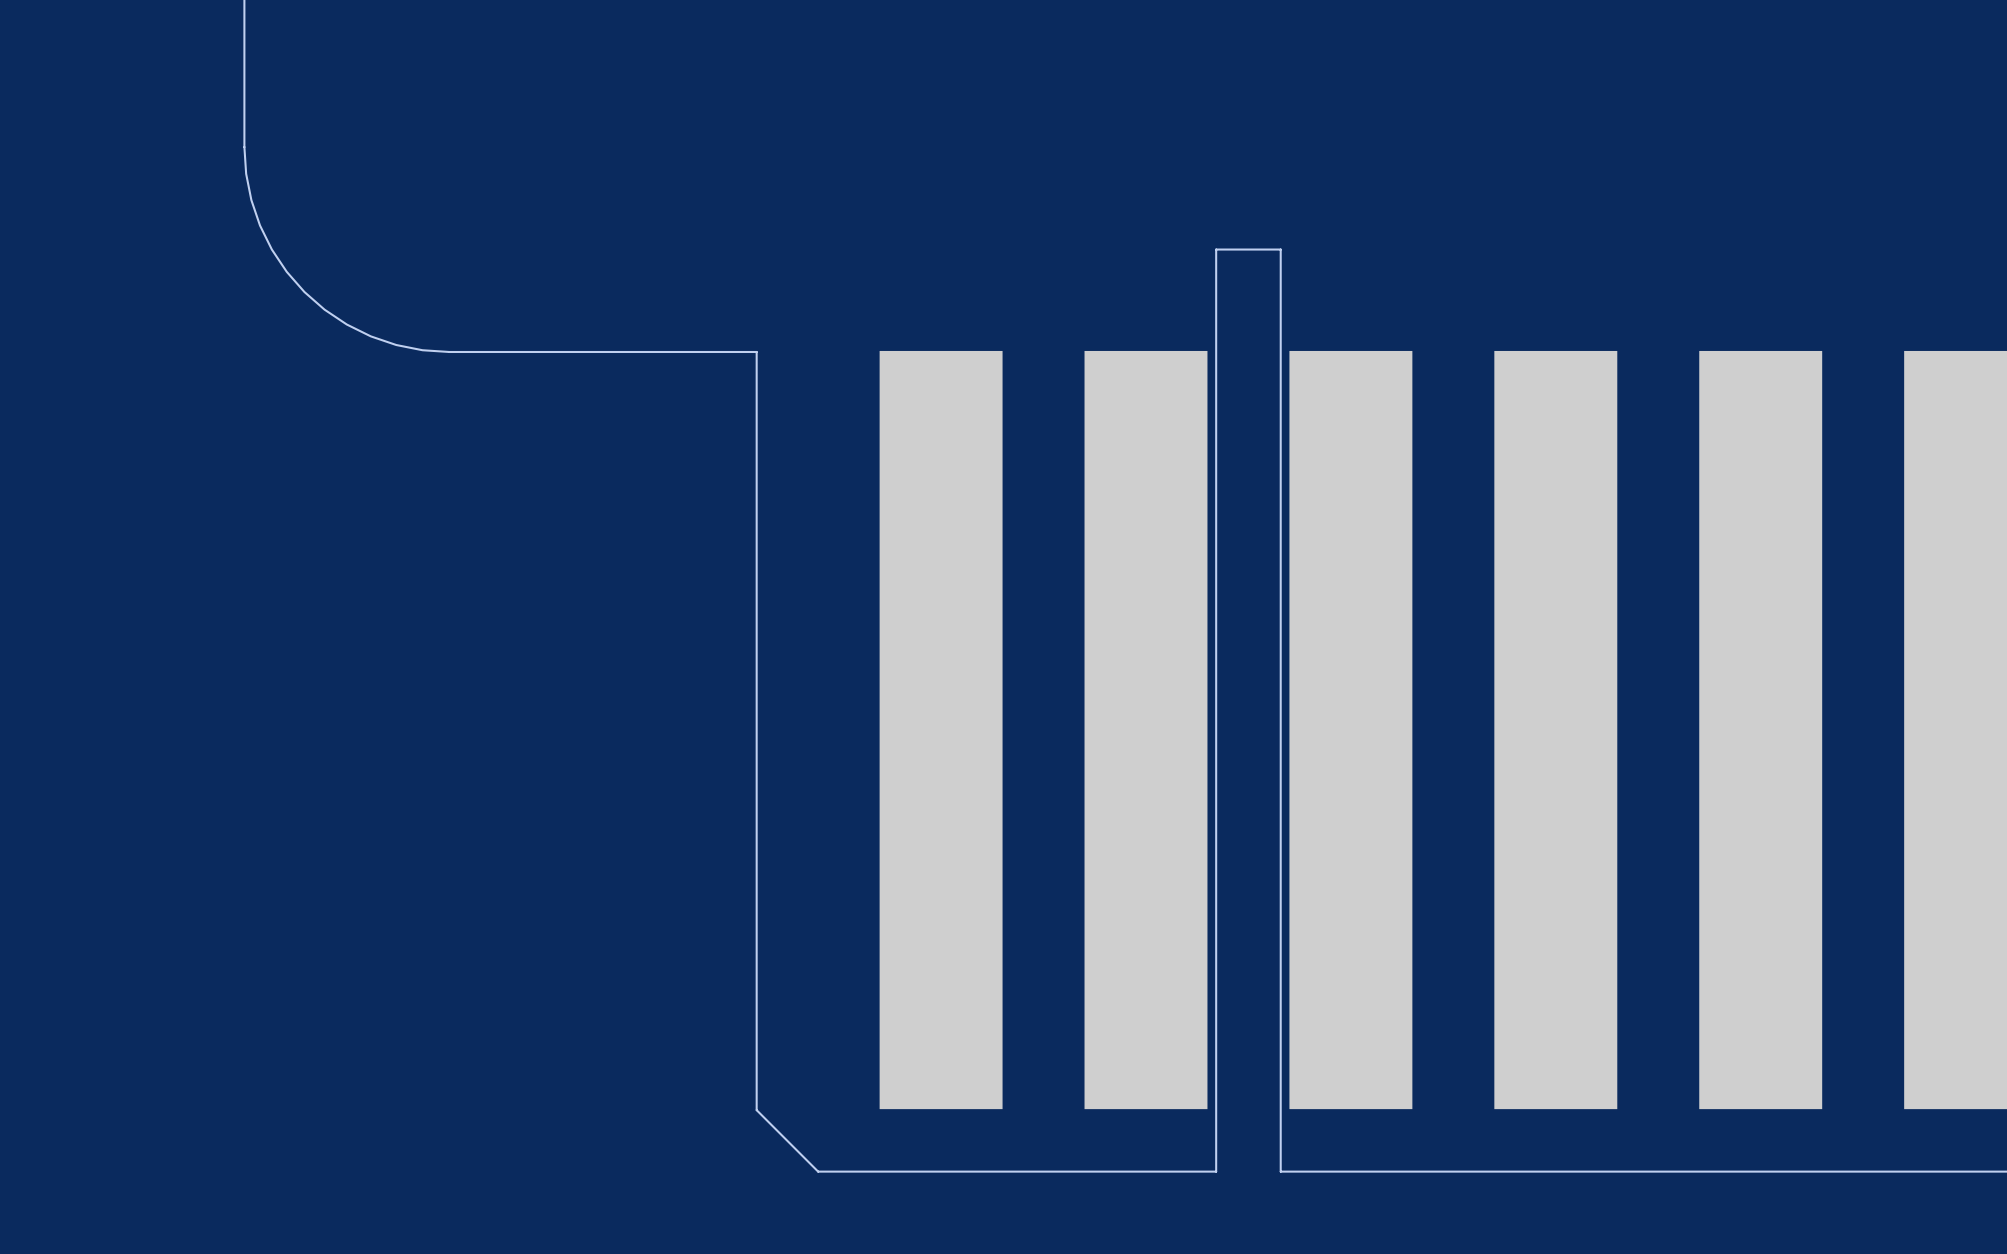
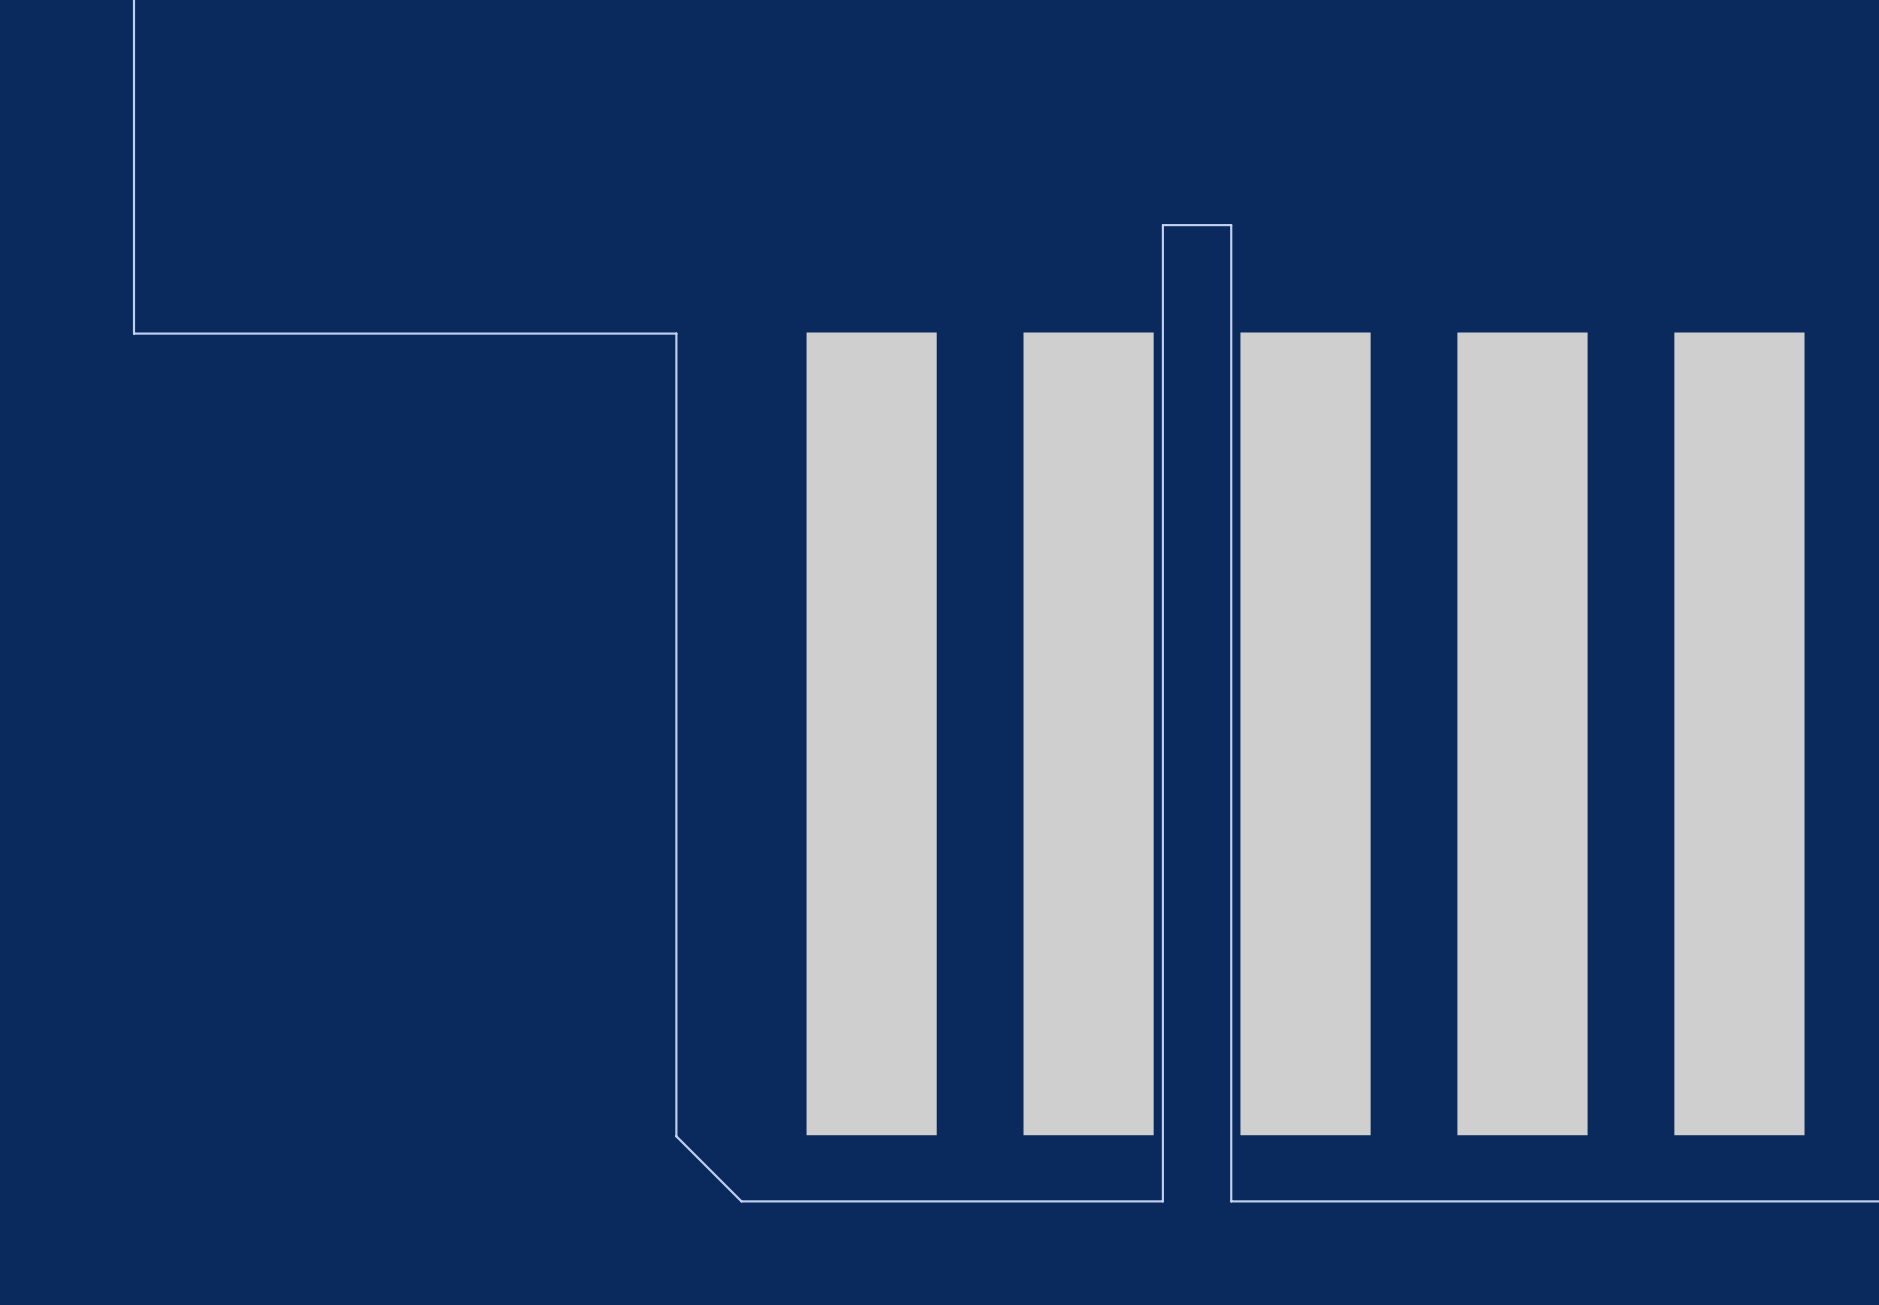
board edge: (244, 147) (246, 173) (251, 200) (259, 225) (271, 249) (286, 271) (304, 291) (324, 309) (346, 324) (370, 336) (396, 345) (422, 350) (449, 351) -> (134, 116) (134, 333) (350, 333)

